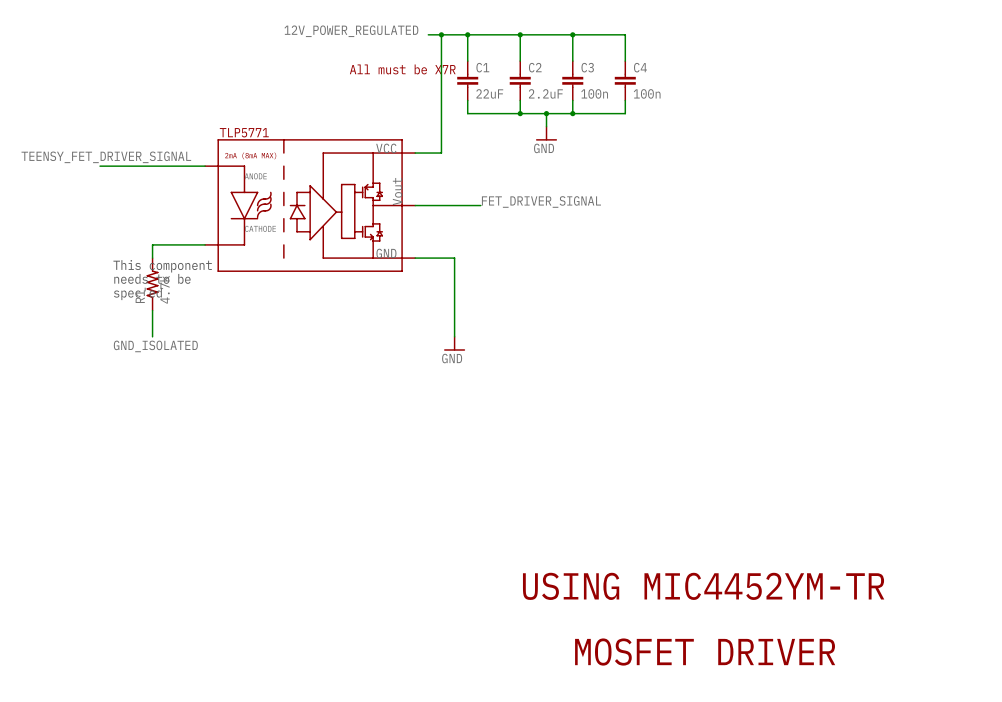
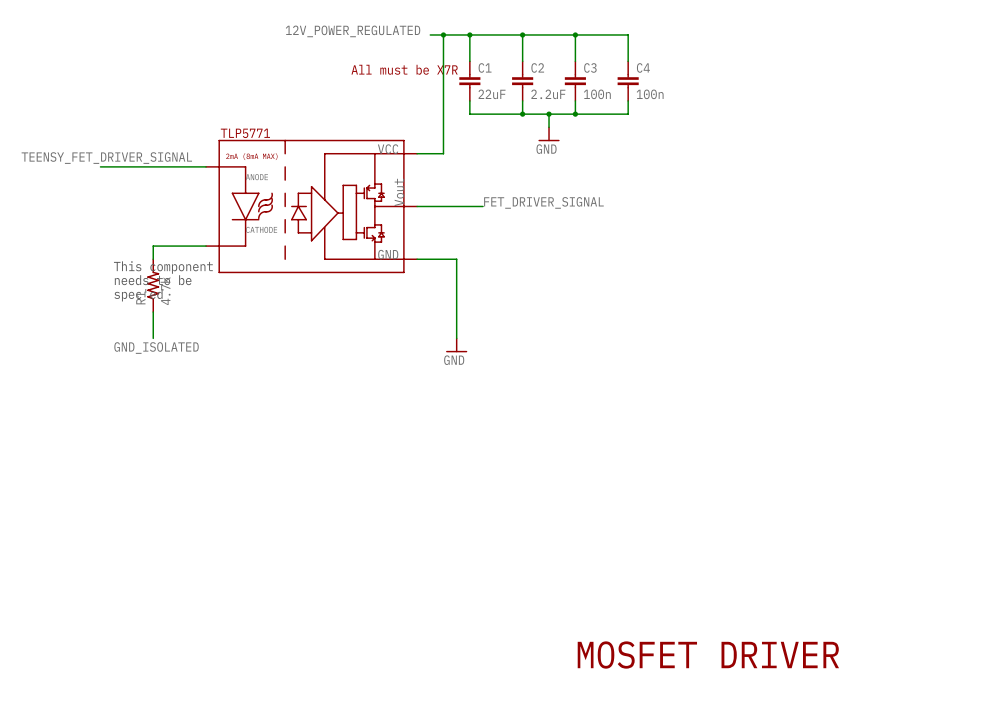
text: USING MIC4452YM-TR (703, 586) -> none

